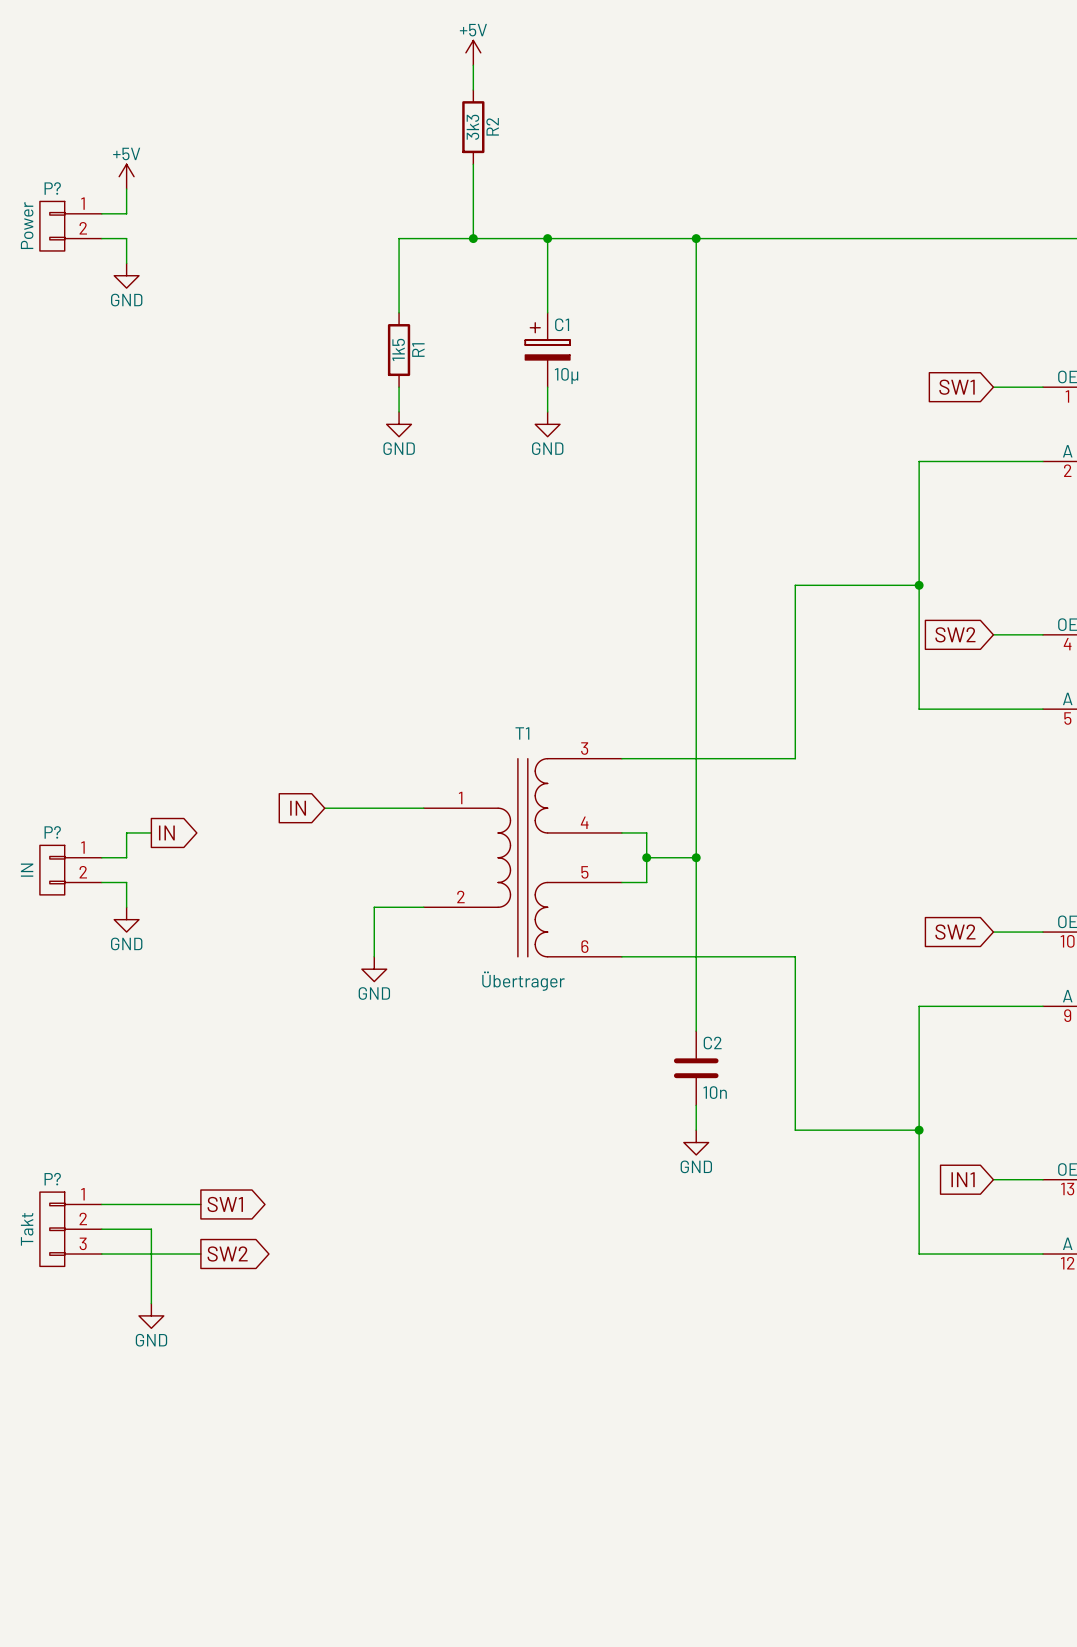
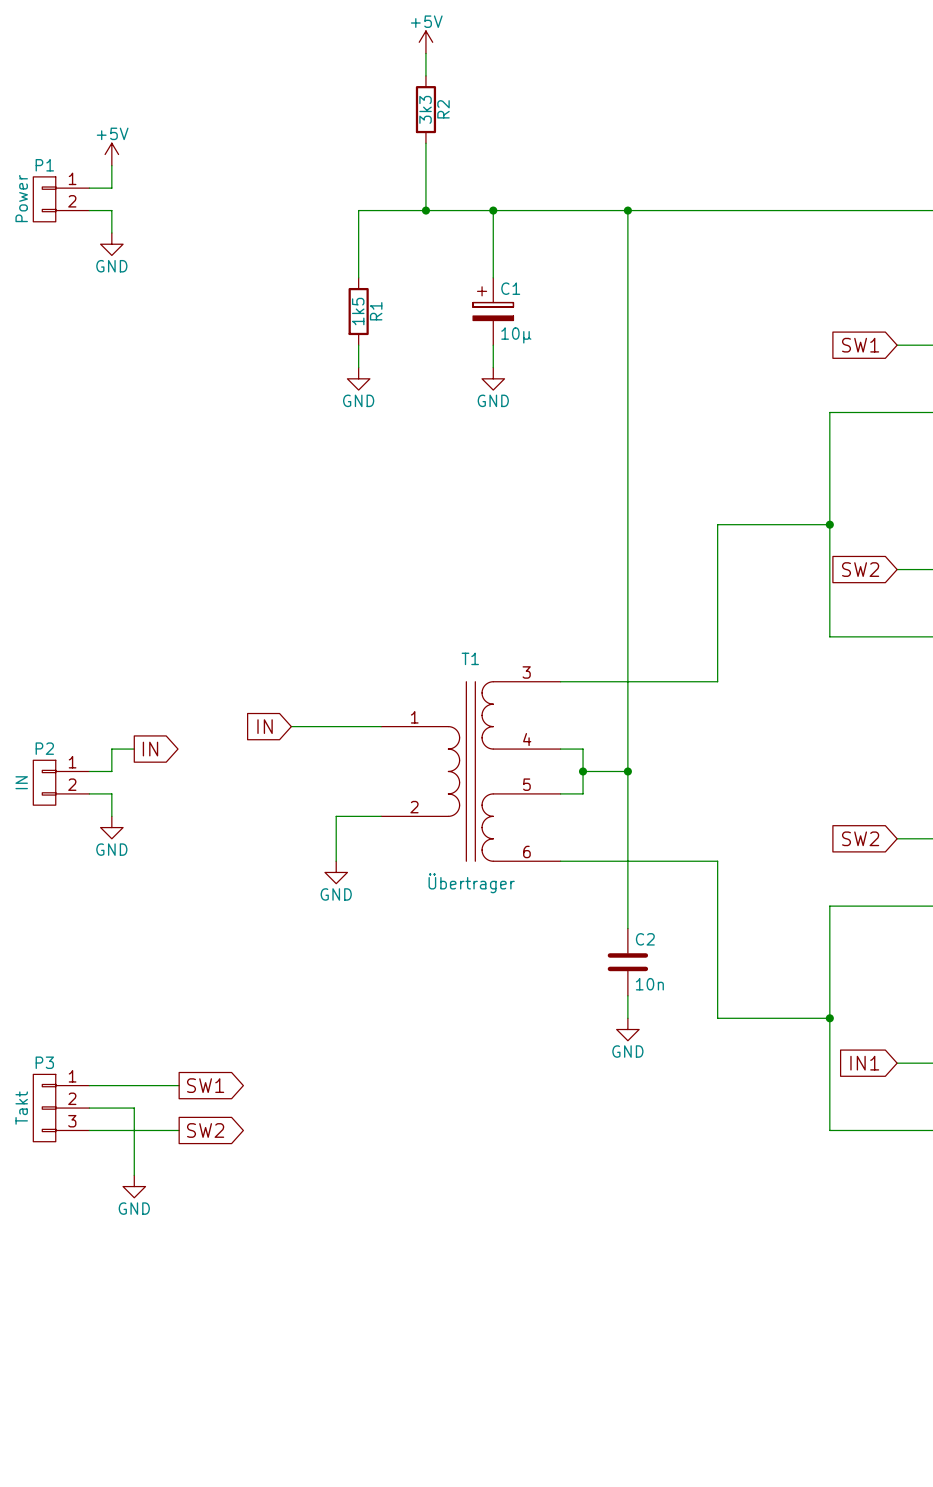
P? name: P? (52, 188) -> P1 (44, 165)
P? name: P? (52, 832) -> P2 (44, 748)
P? name: P? (52, 1179) -> P3 (44, 1062)

